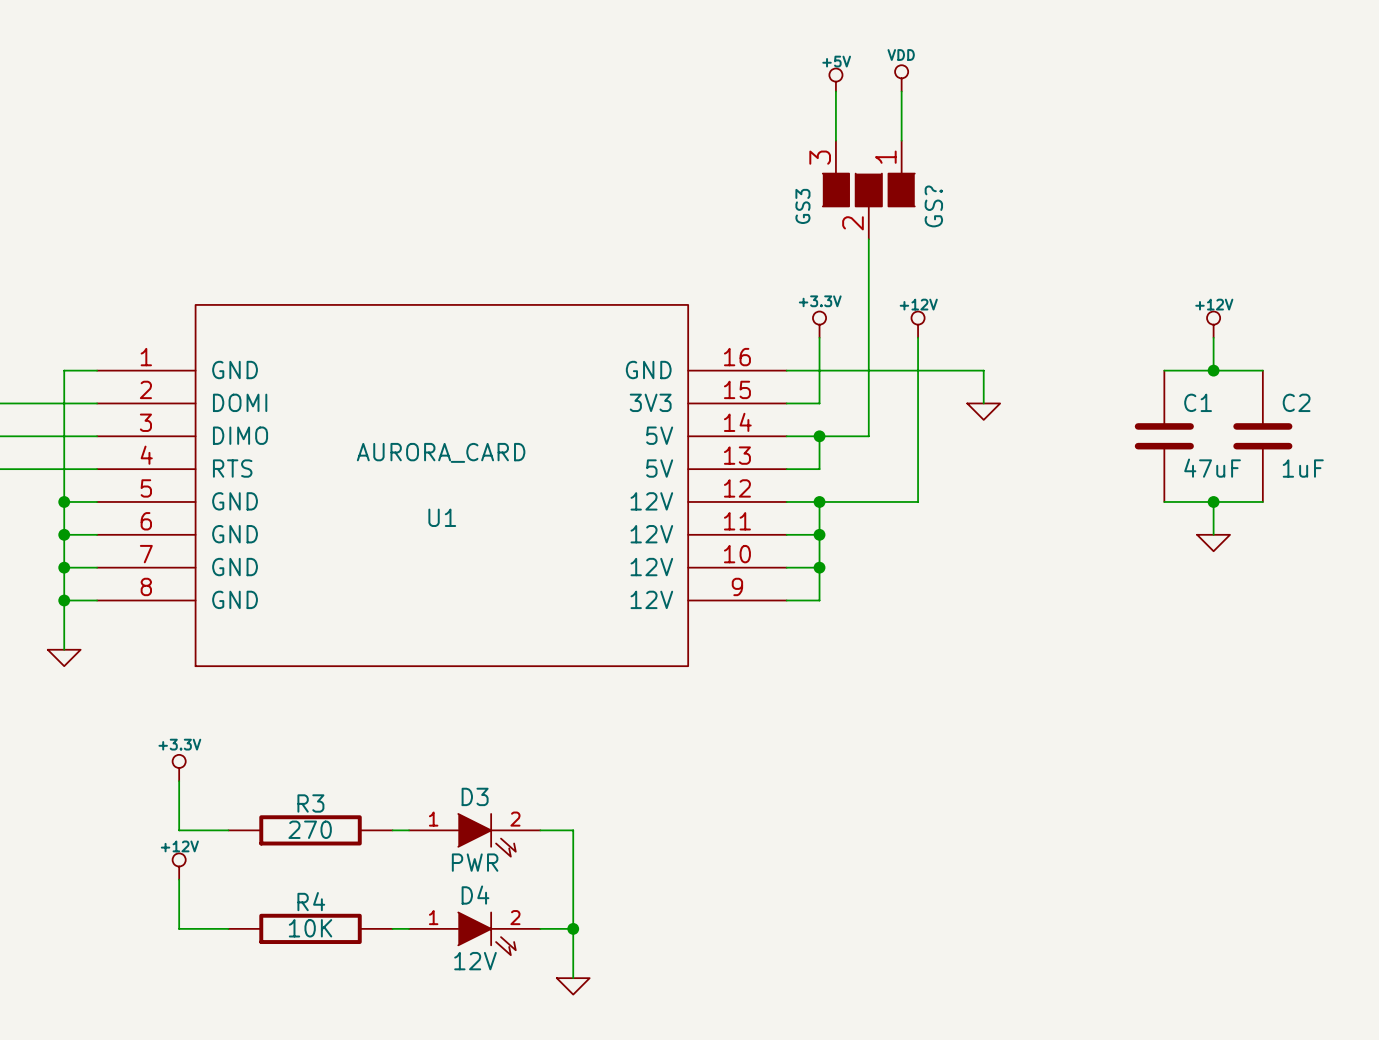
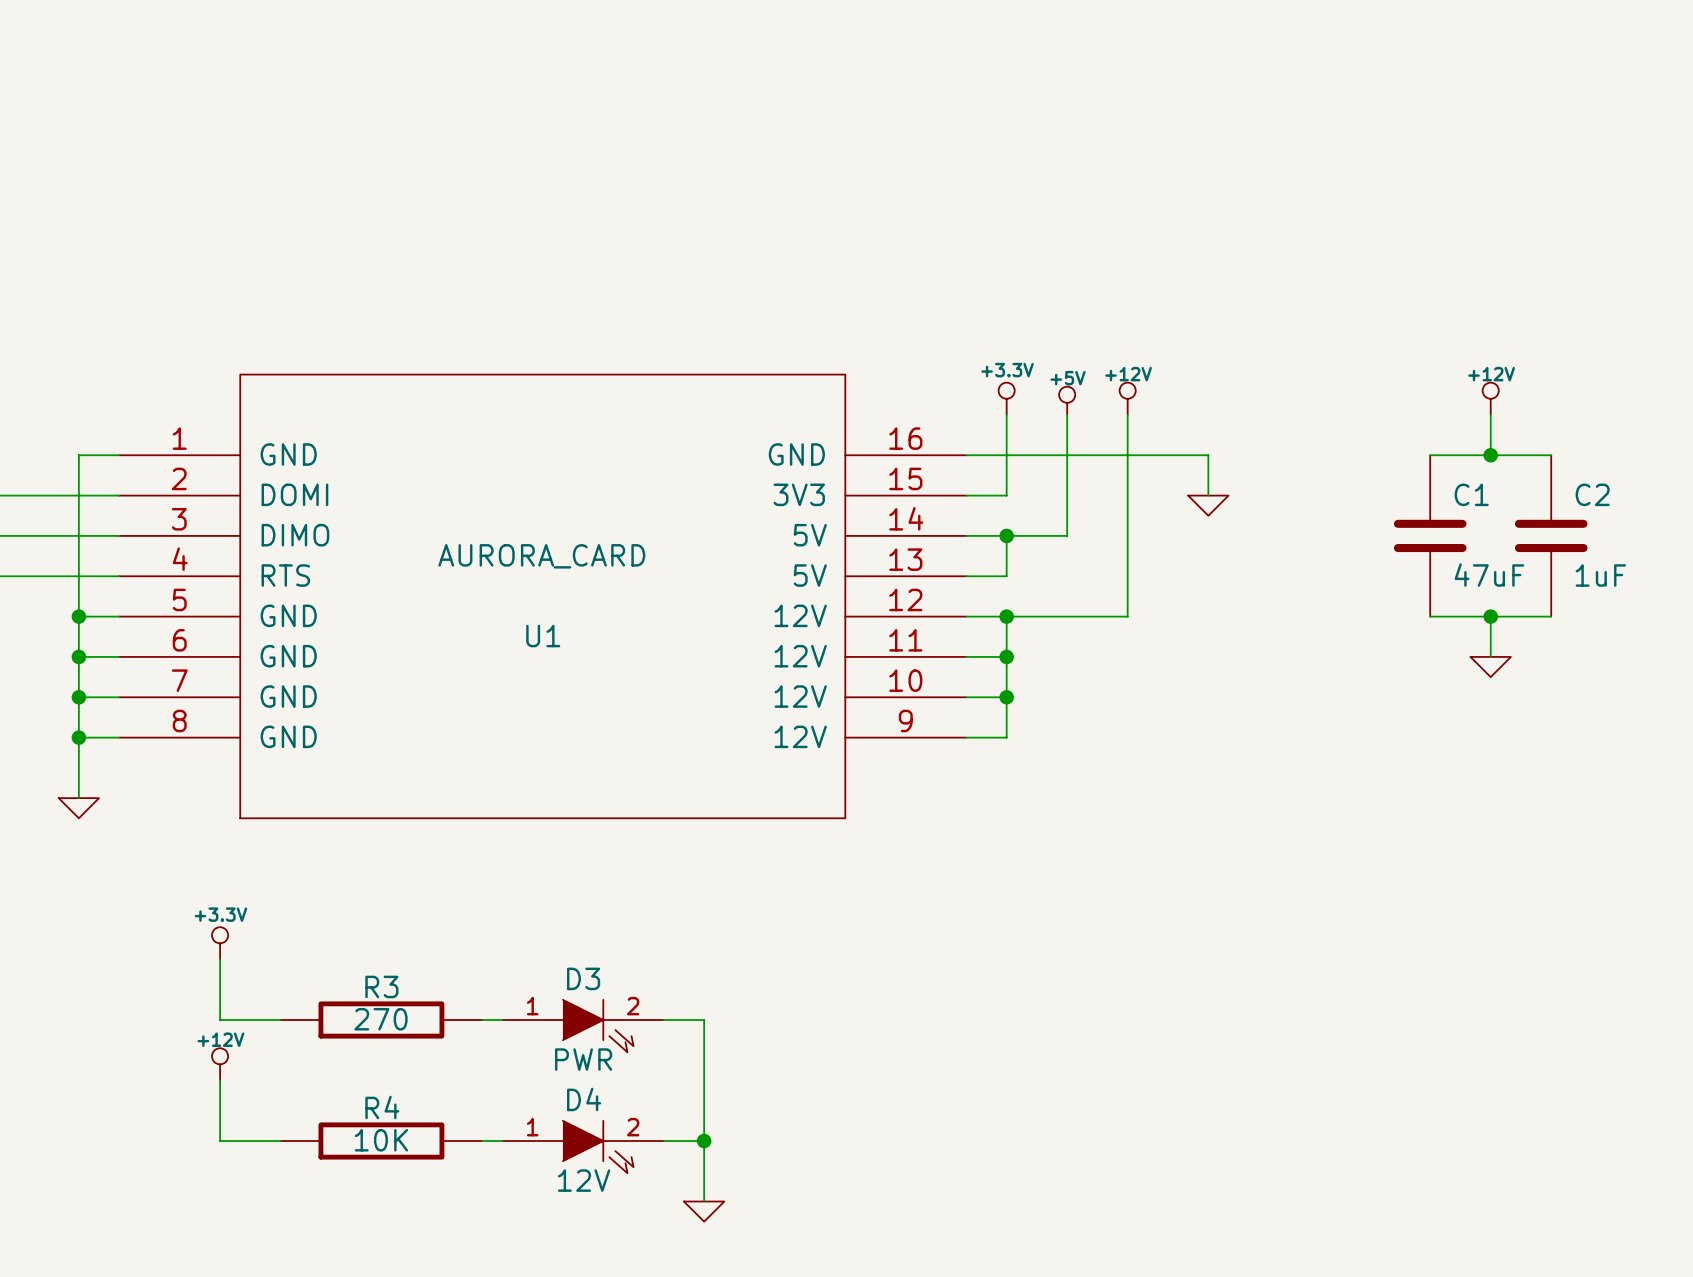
power symbol: VDD (901, 78) -> none
power symbol position: +5V (835, 80) -> +5V (1067, 400)
wire: (835, 91) (835, 140) -> none
wire: (901, 91) (901, 140) -> none
GS?: GS3 (868, 190) -> none
wire: (868, 239) (868, 337) -> none

